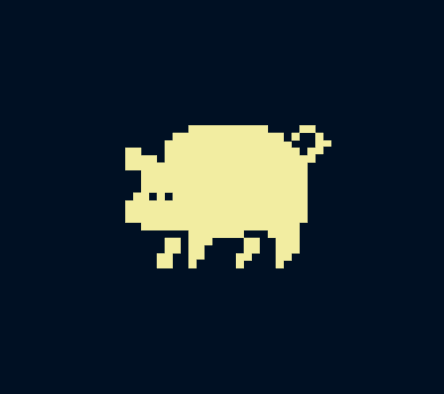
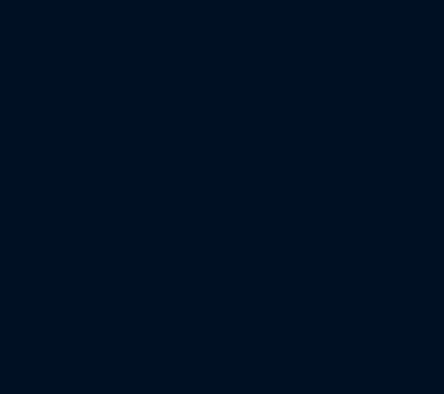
drawing: [125, 125, 332, 269] -> none

